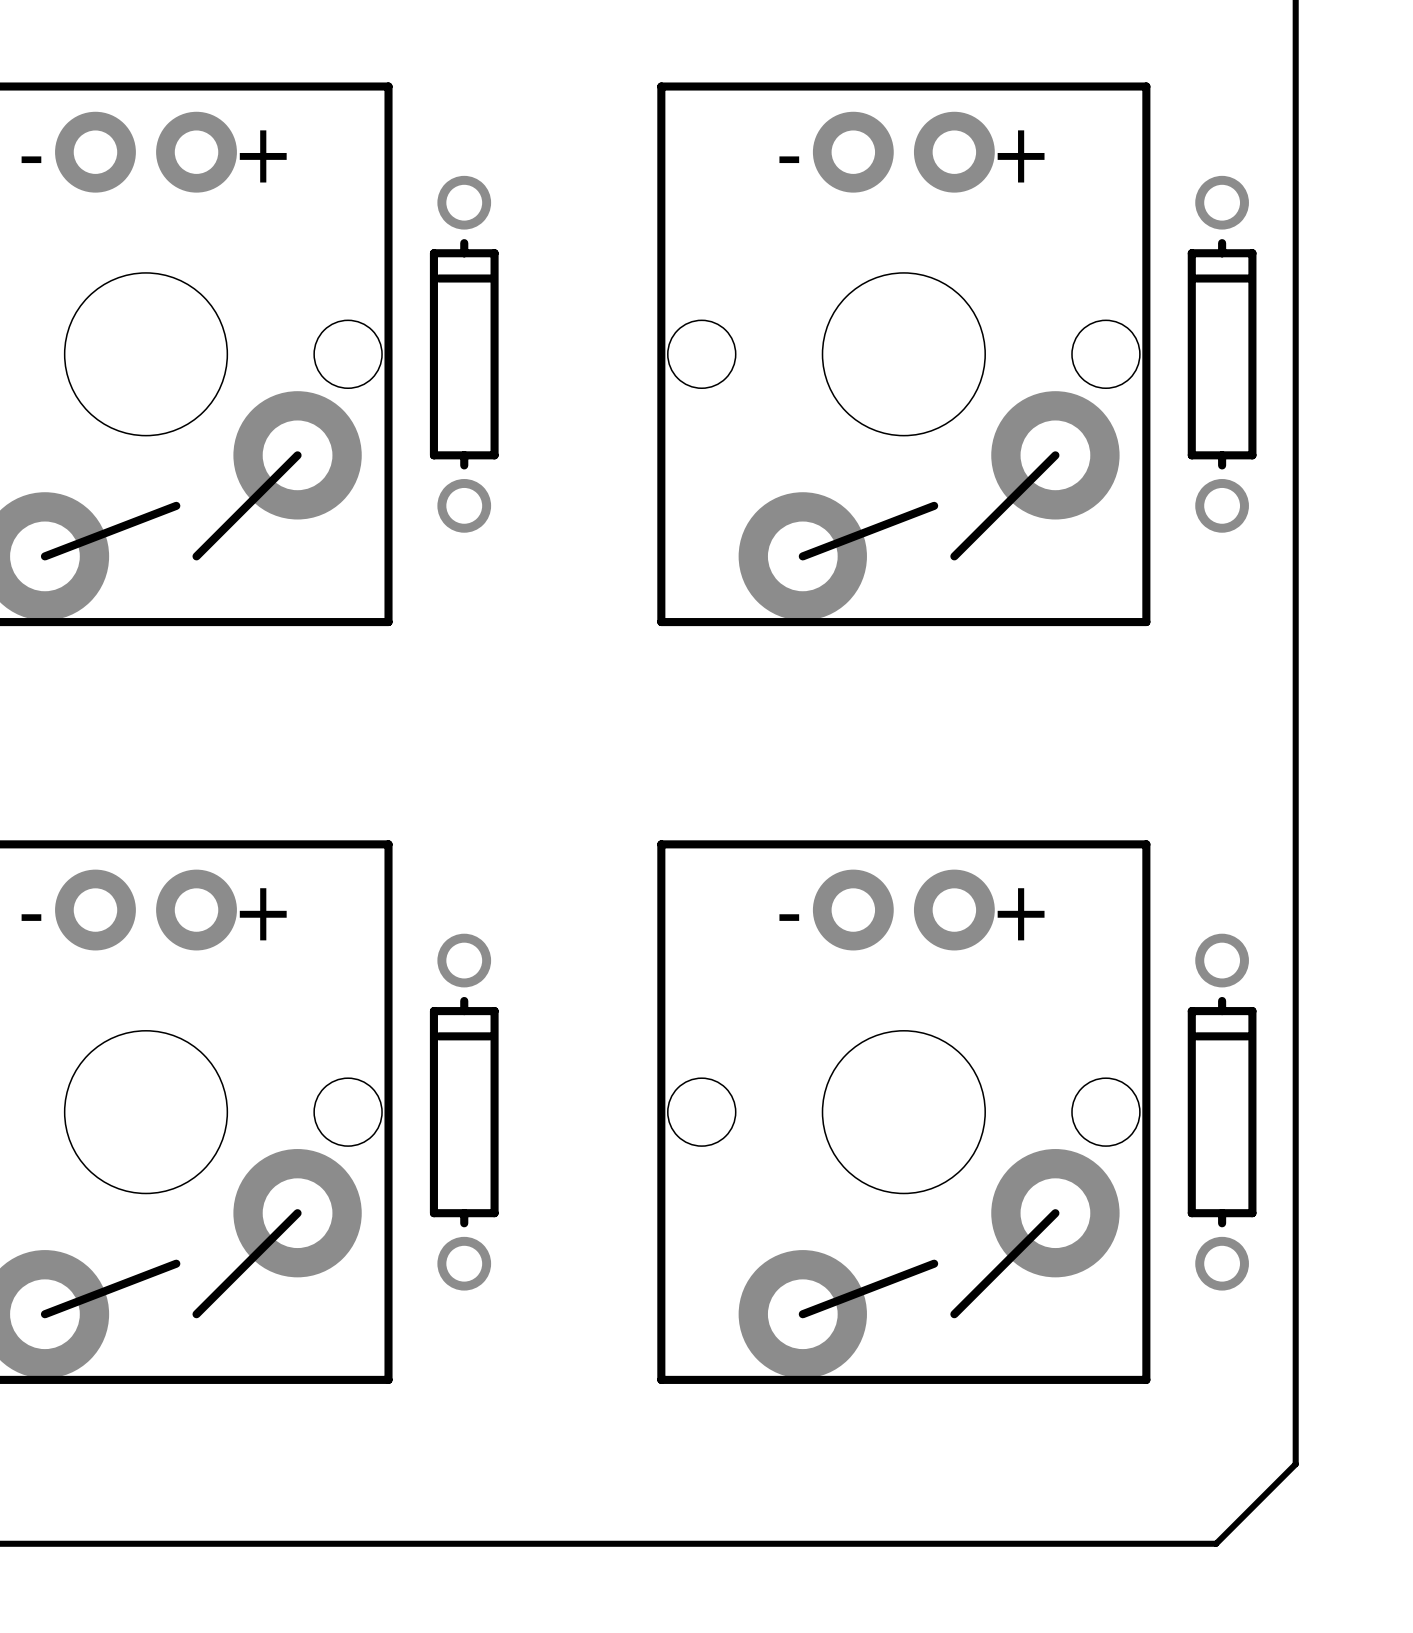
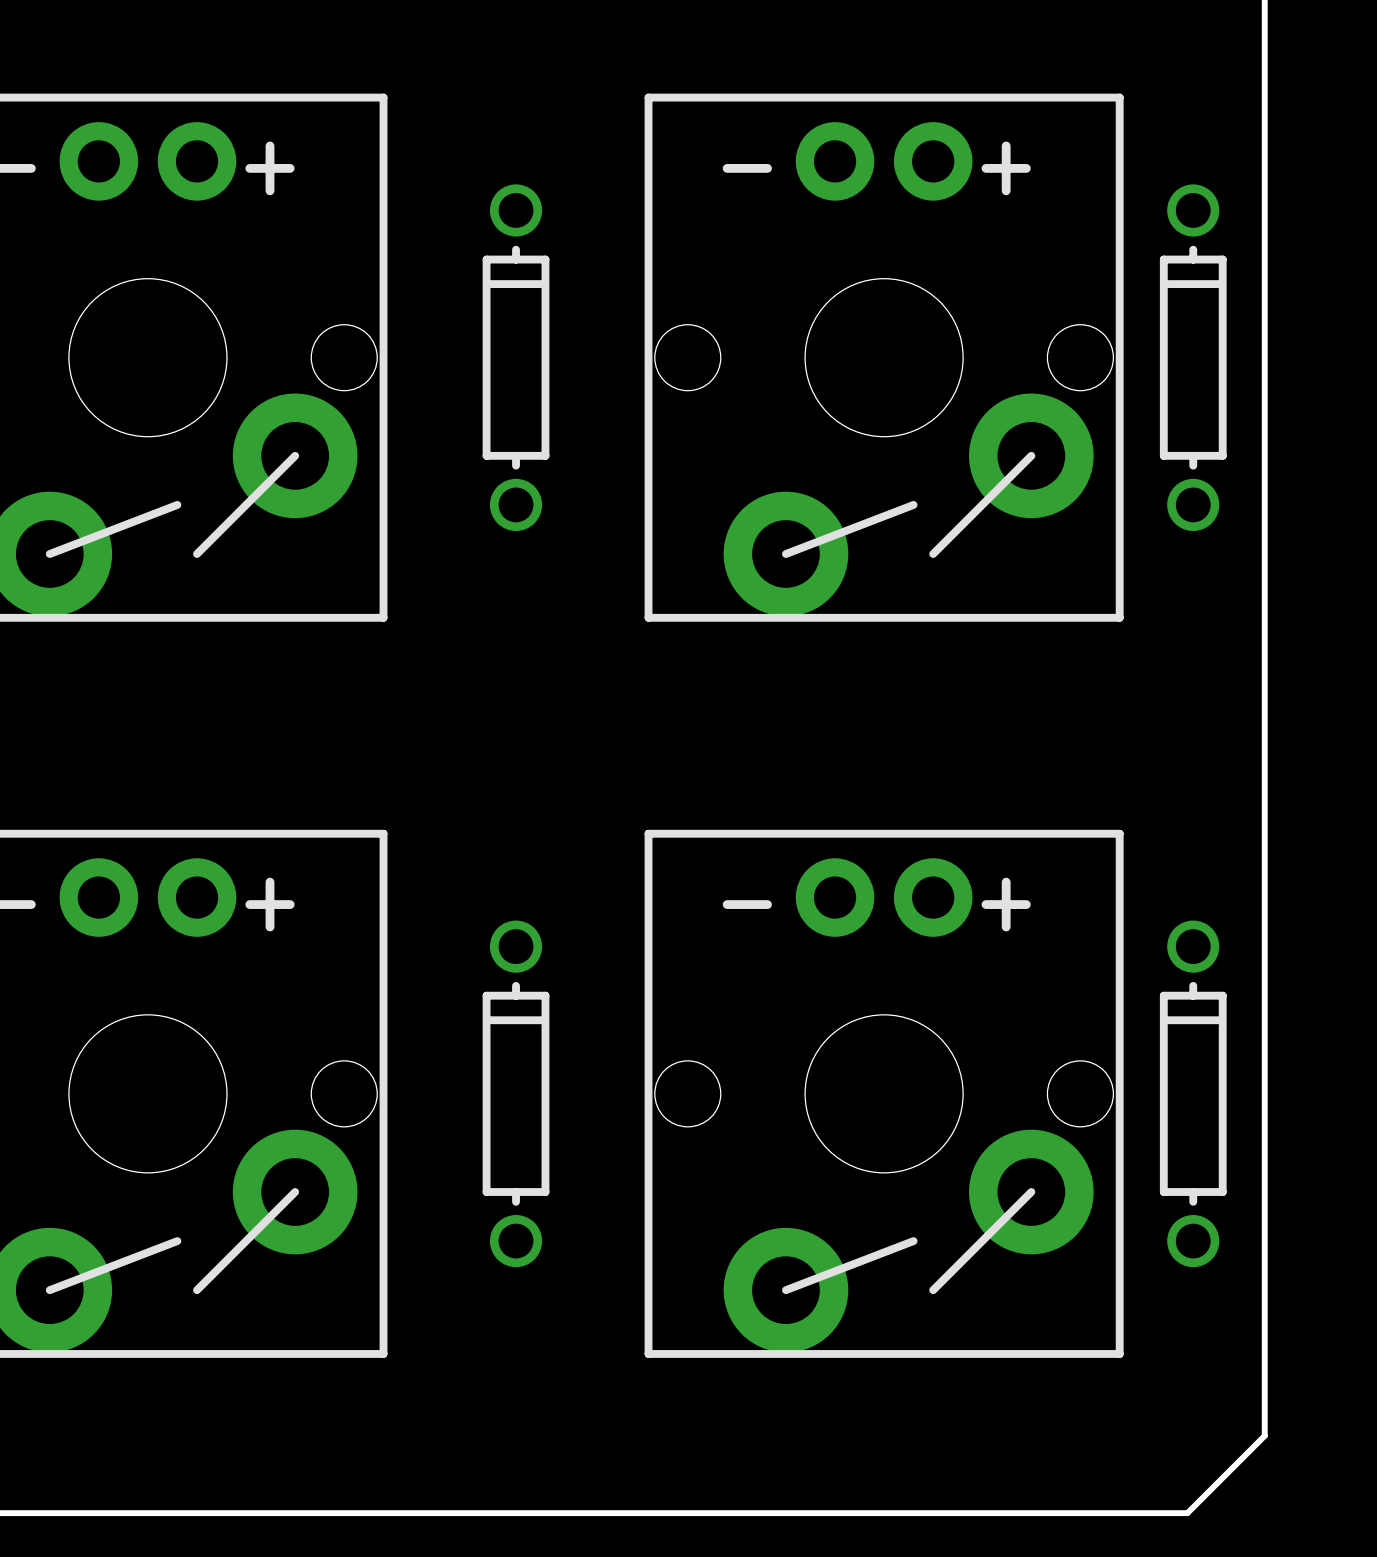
part position: (464, 354) -> (516, 357)
part position: (464, 1112) -> (516, 1093)

